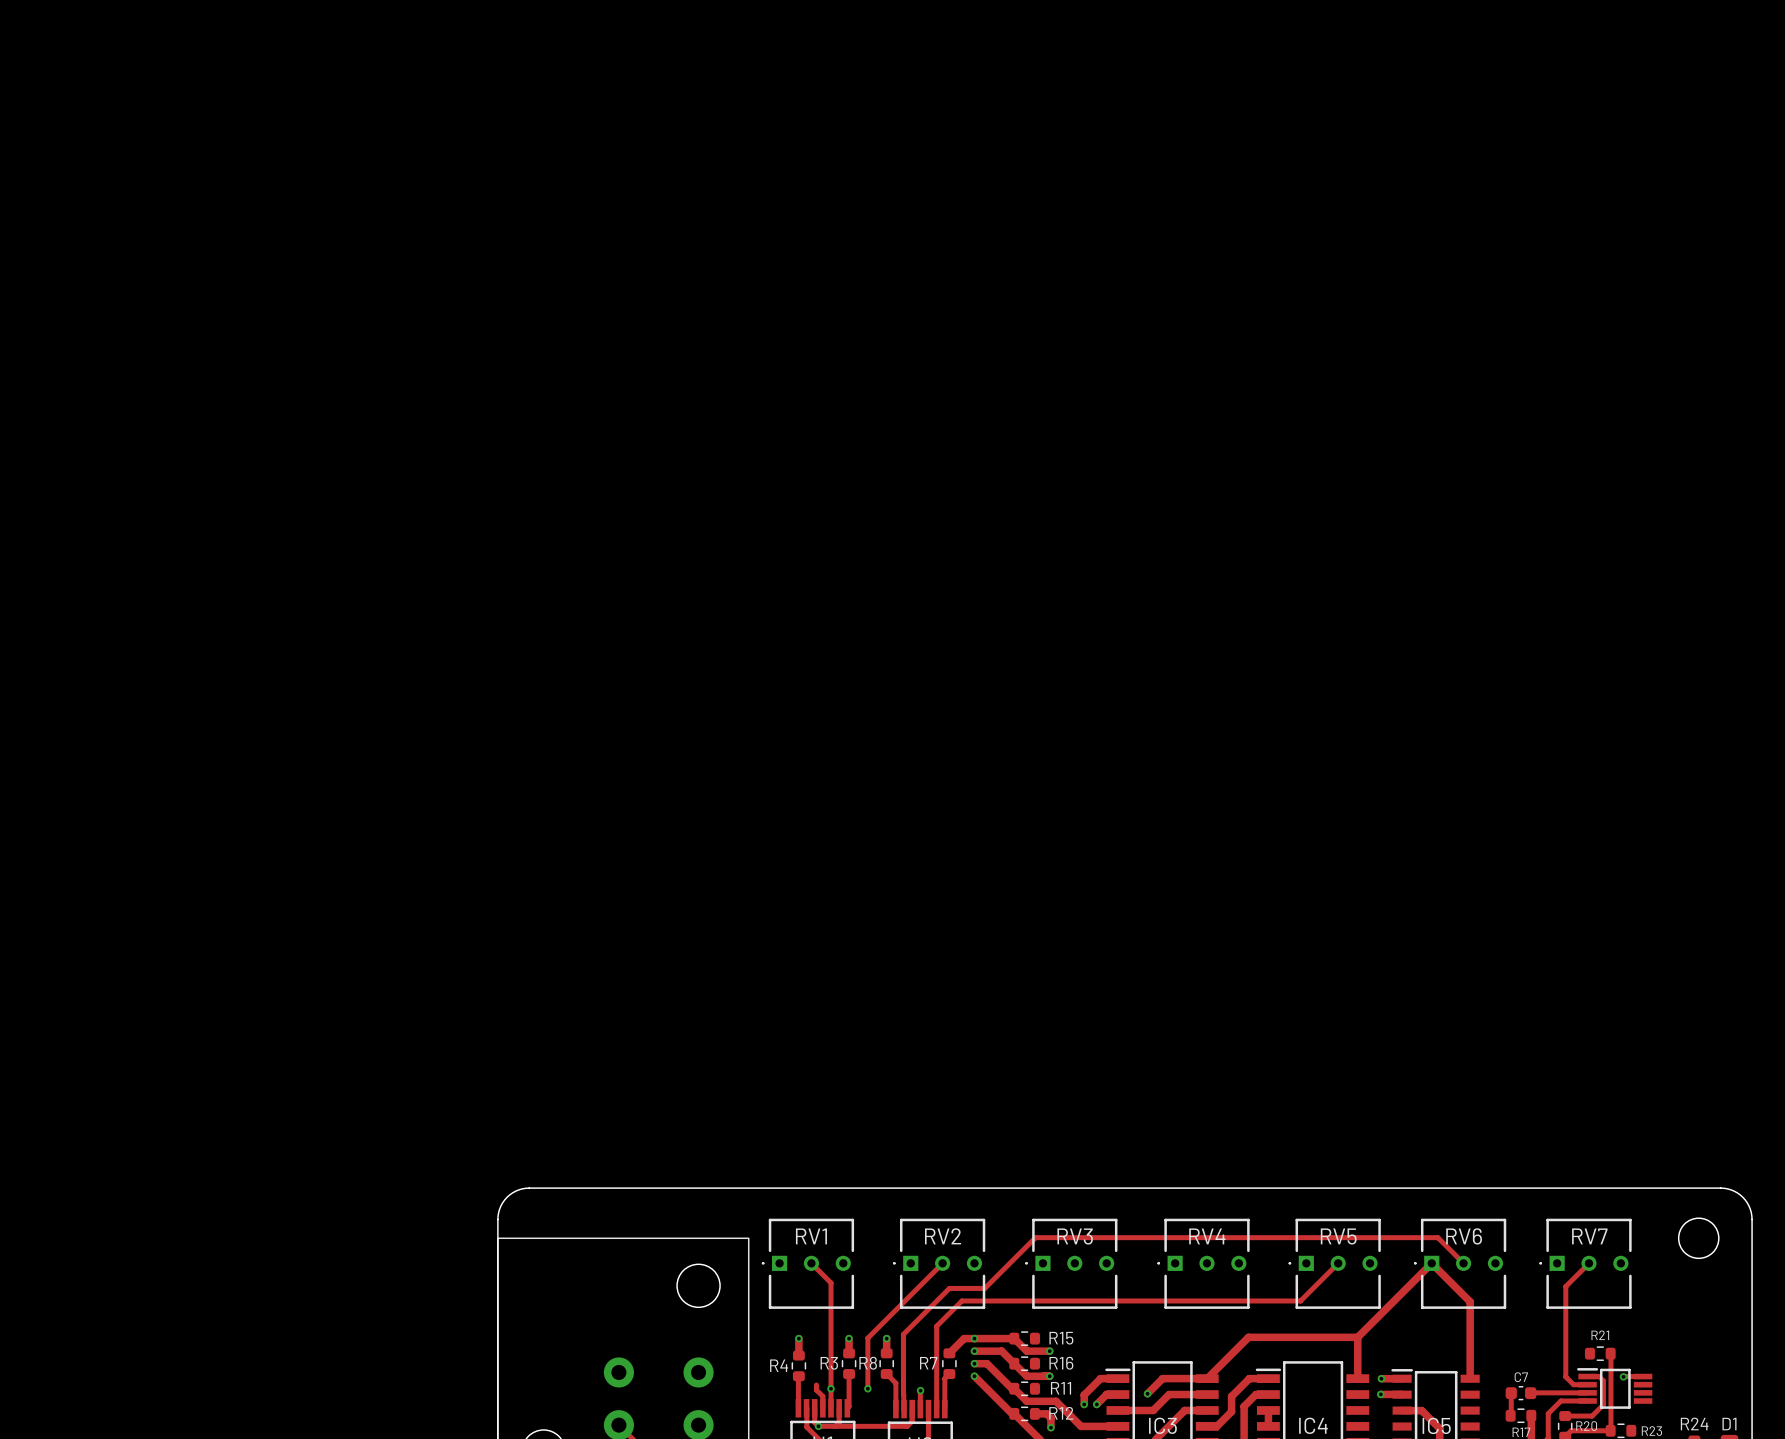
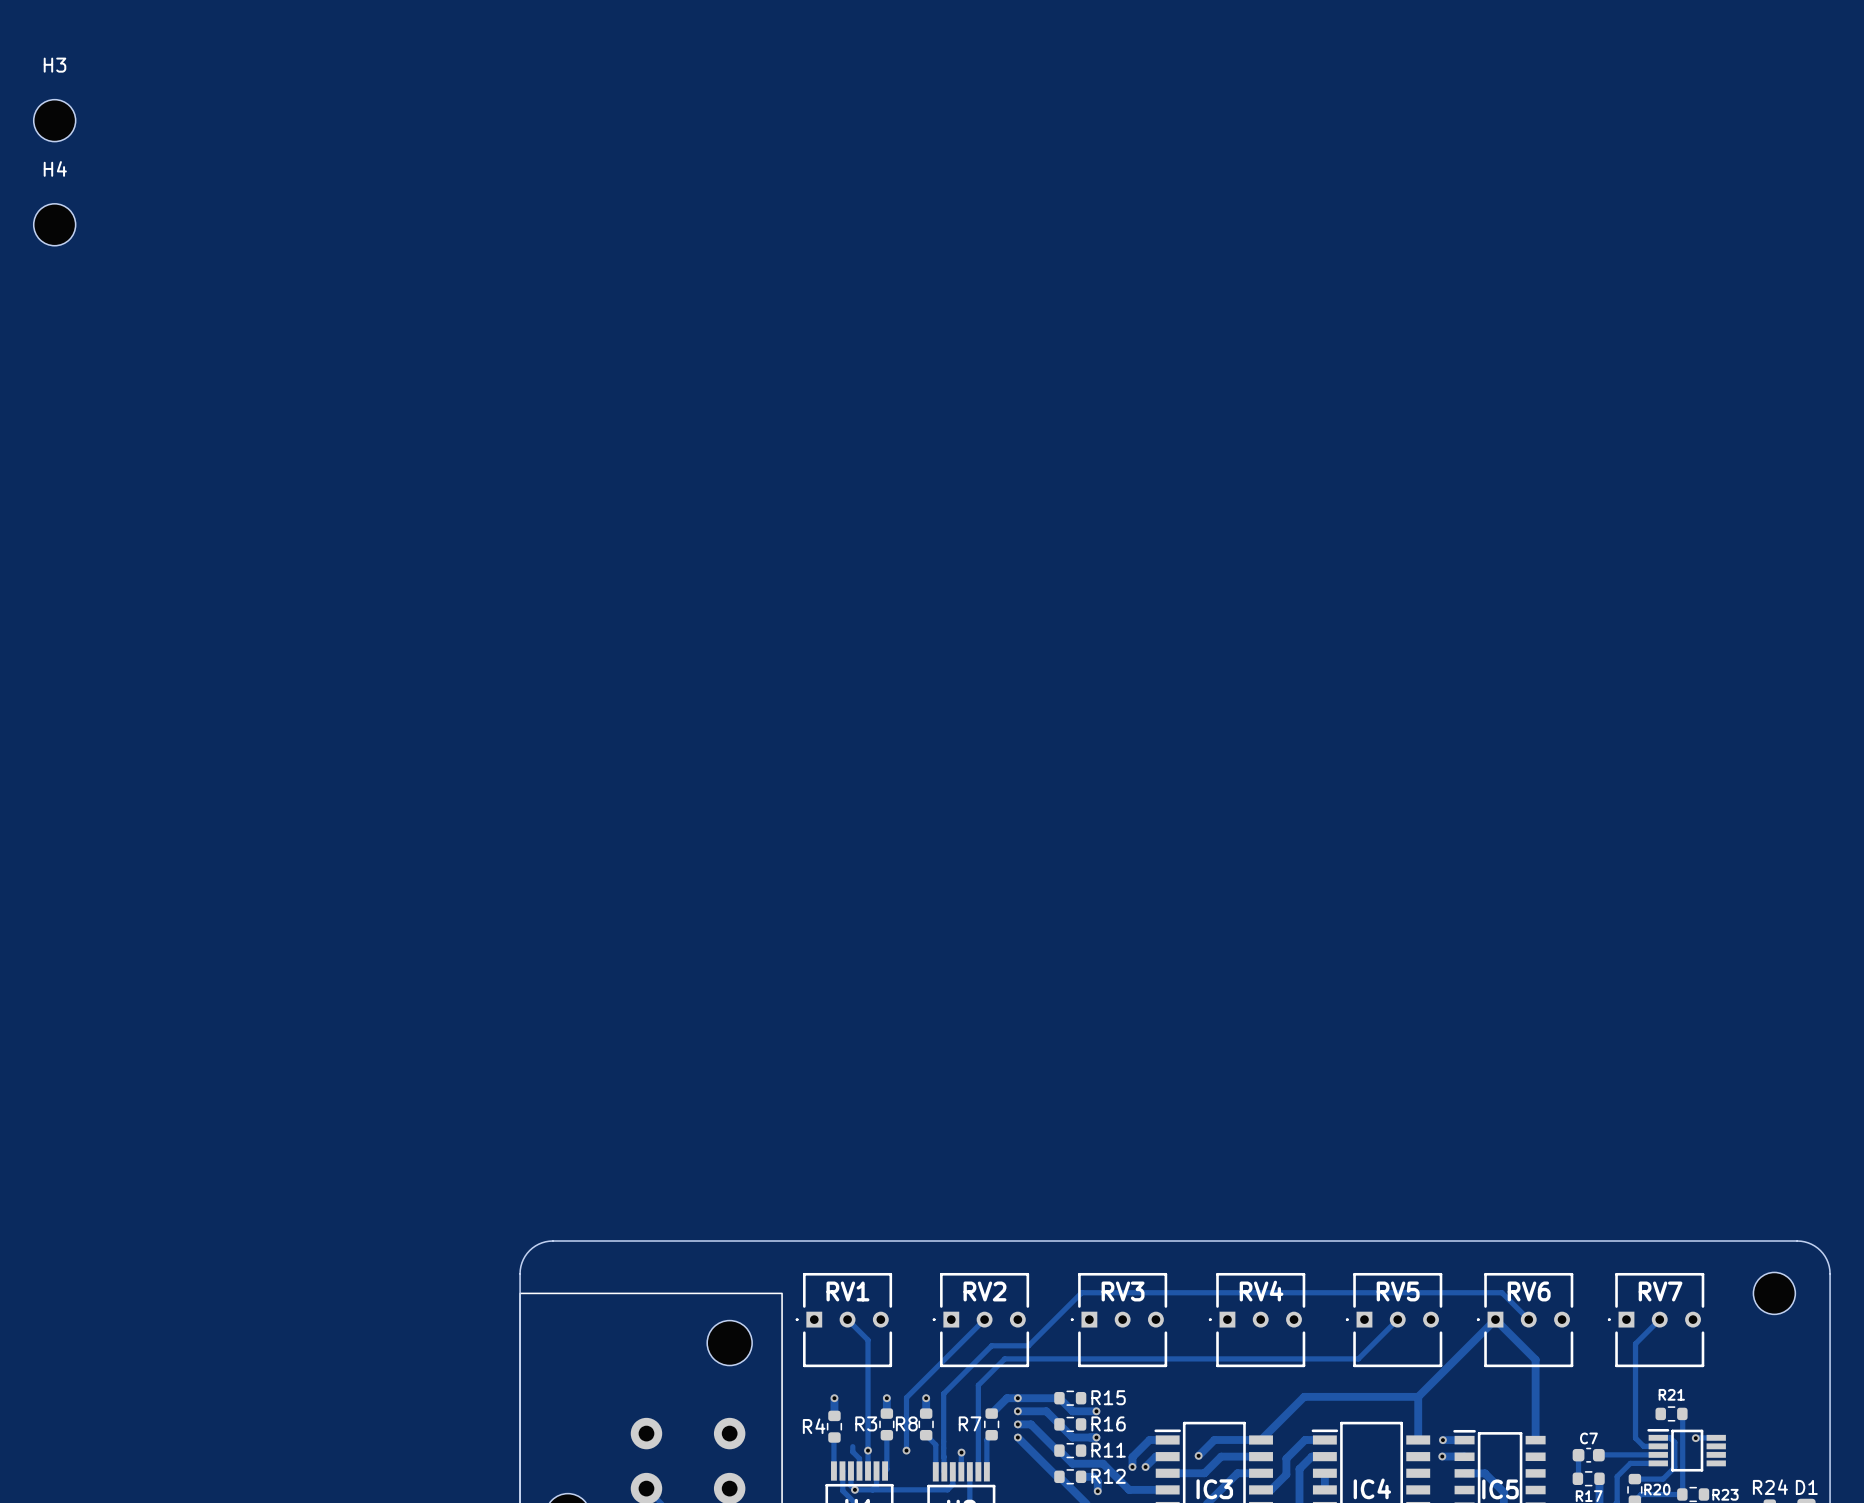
H3: none -> (54, 120)
H4: none -> (54, 224)

